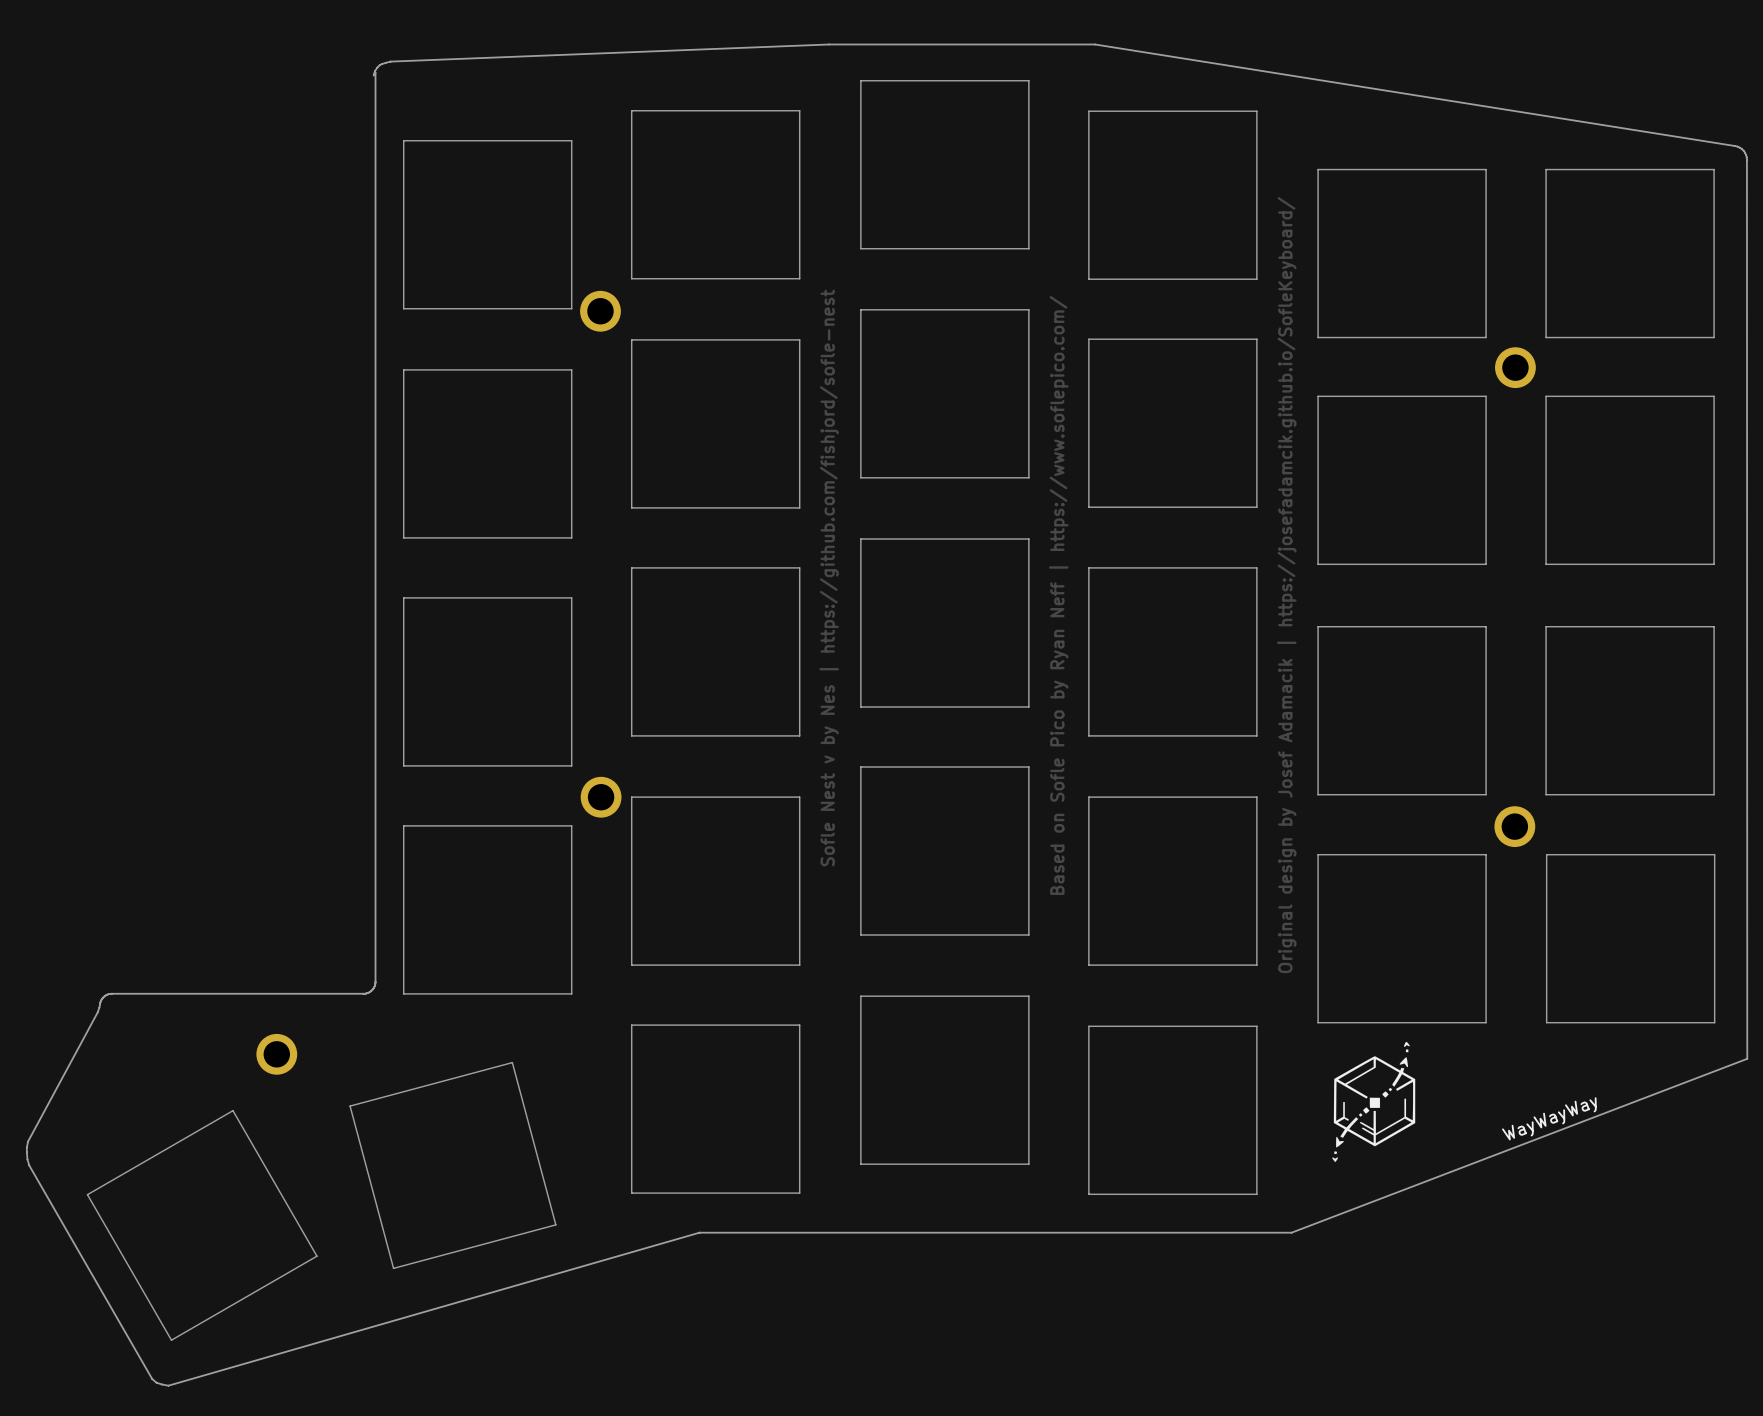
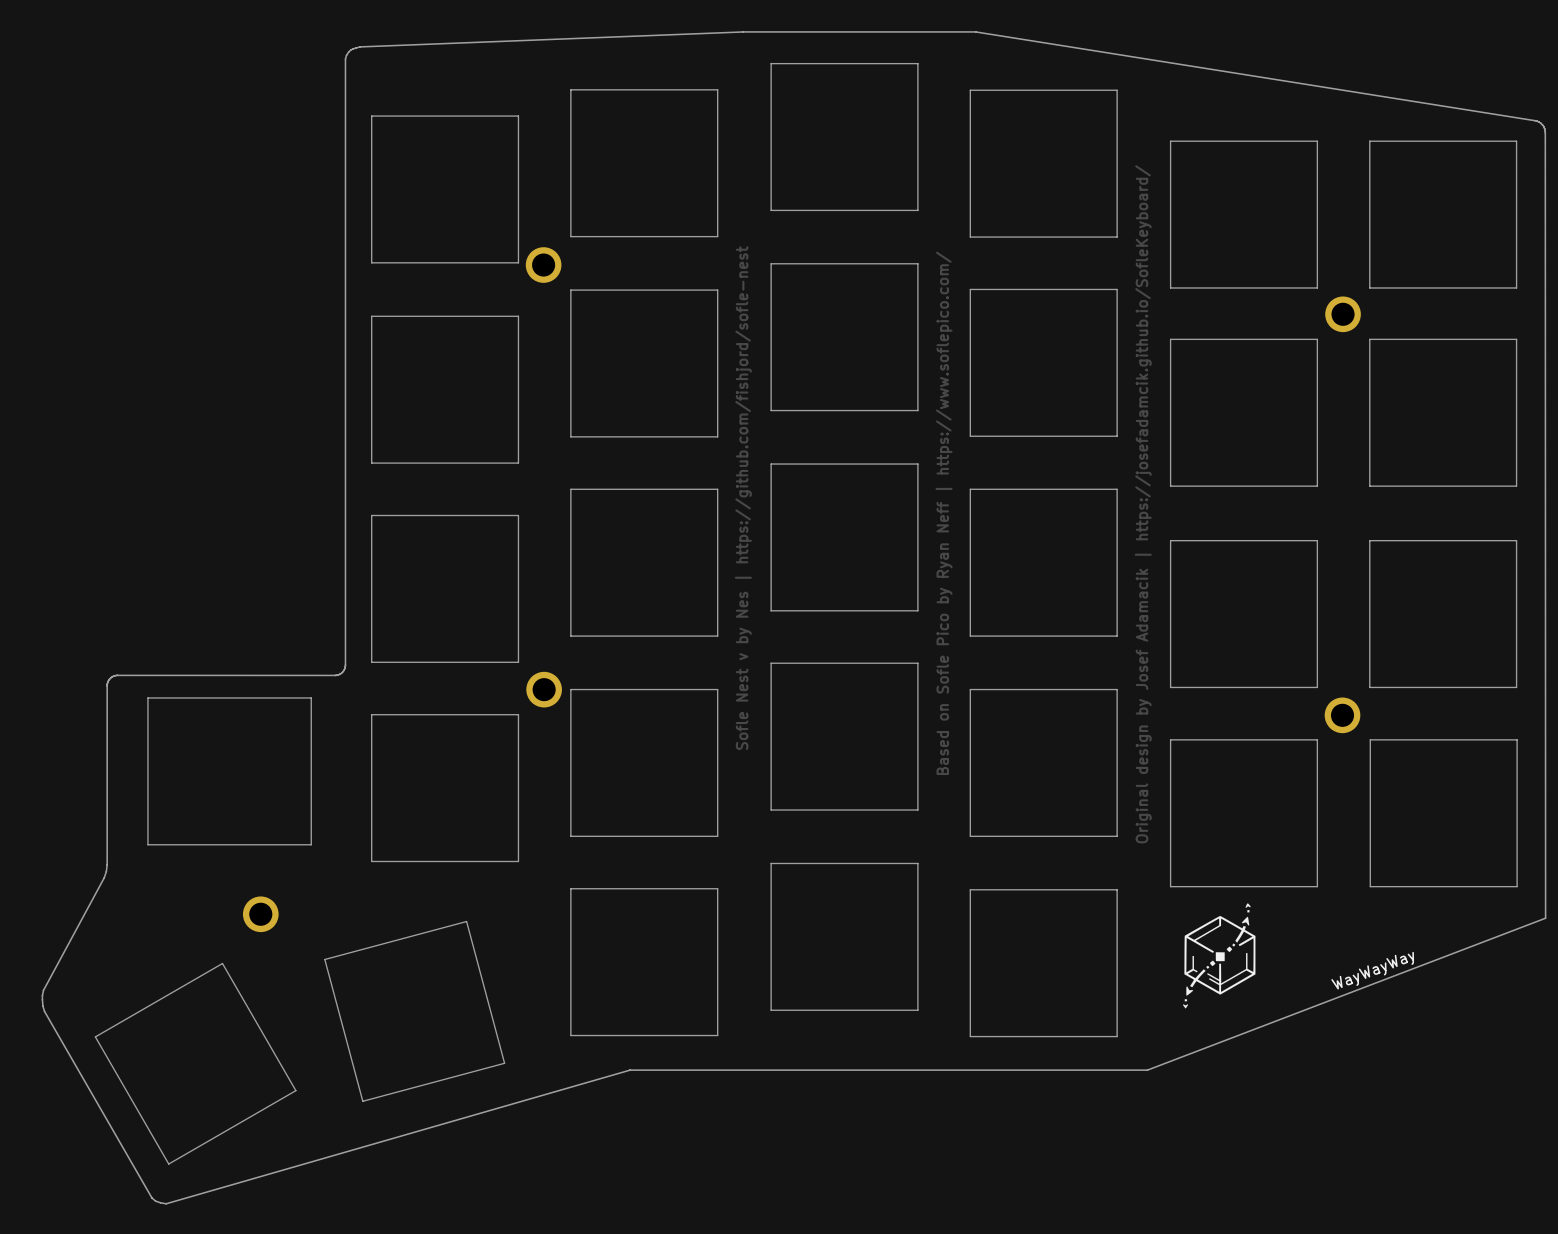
board edge: (373, 75) (375, 72) (374, 985) (370, 991) (364, 993) (110, 993) (101, 999) (97, 1012) -> (345, 58) (344, 668) (340, 673) (335, 675) (117, 675) (110, 678) (107, 685) (107, 864) (104, 877)
board edge: none -> (147, 697) (147, 844) (311, 844) (311, 697) (147, 697)

